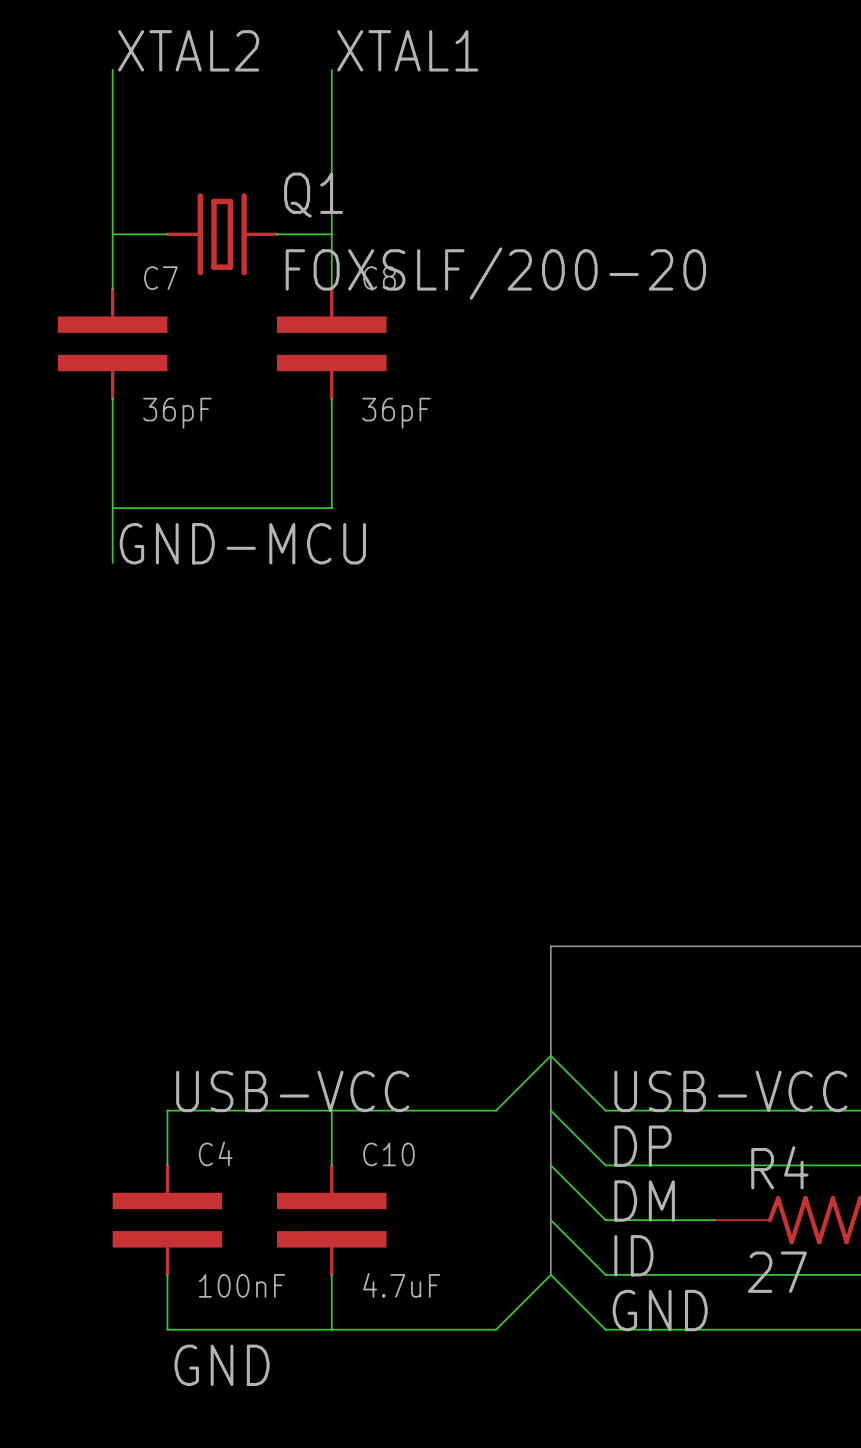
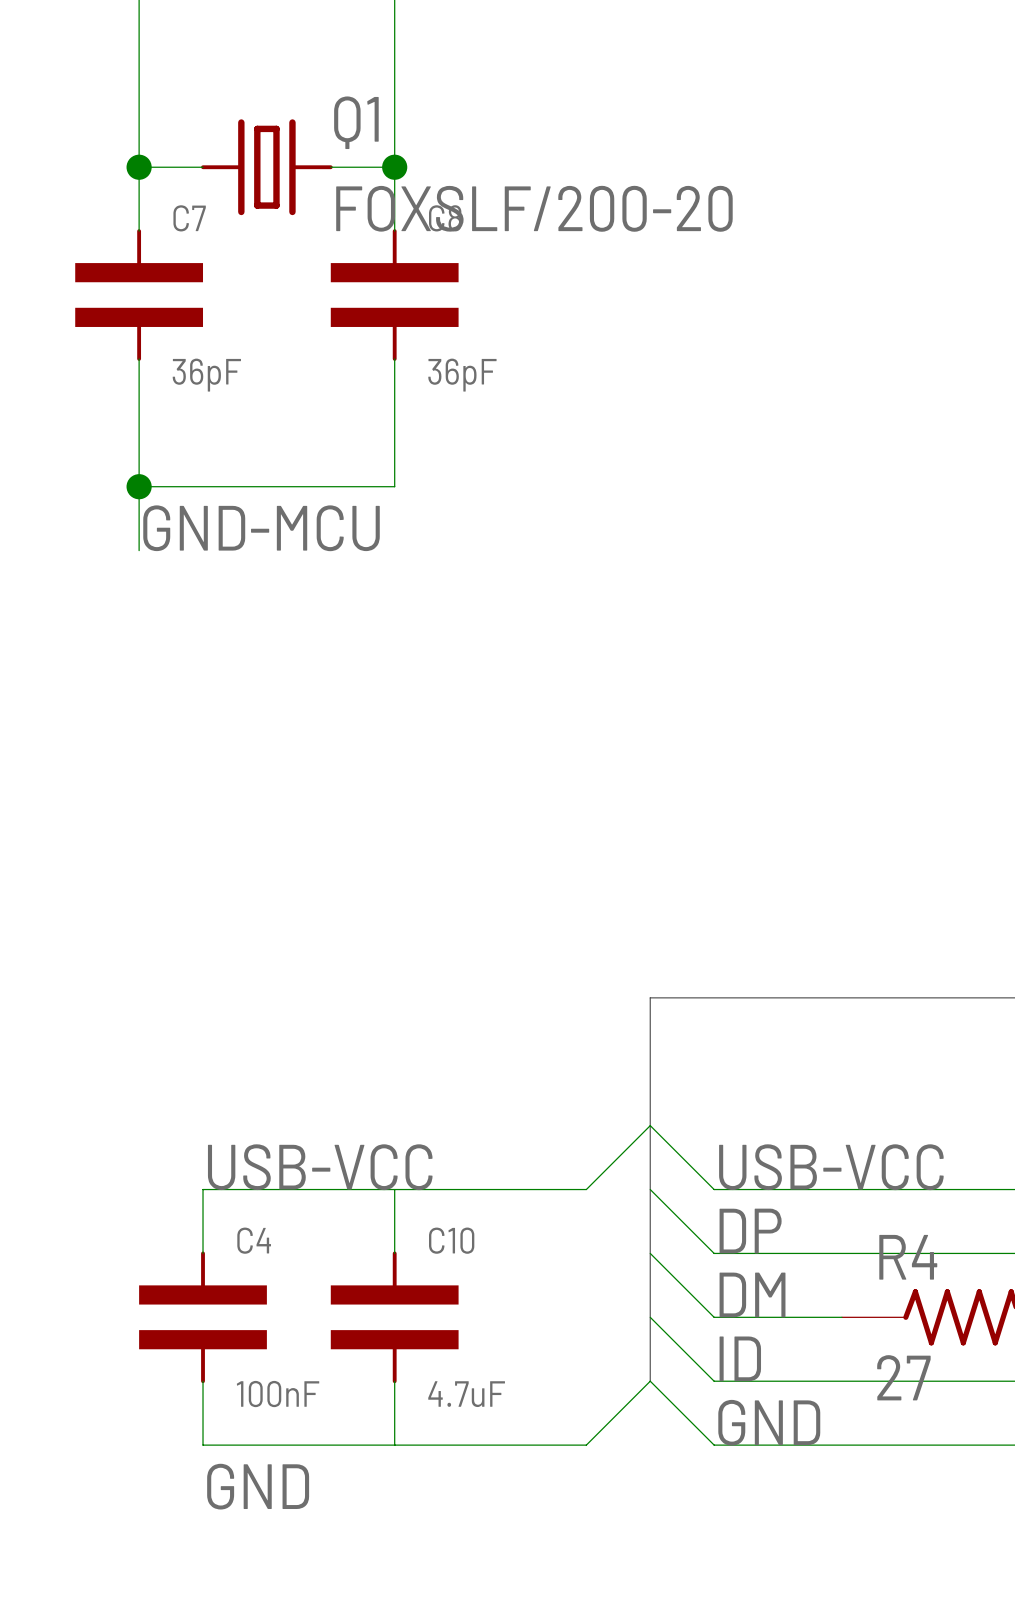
junction: none -> (139, 167)
junction: none -> (394, 167)
junction: none -> (139, 486)

